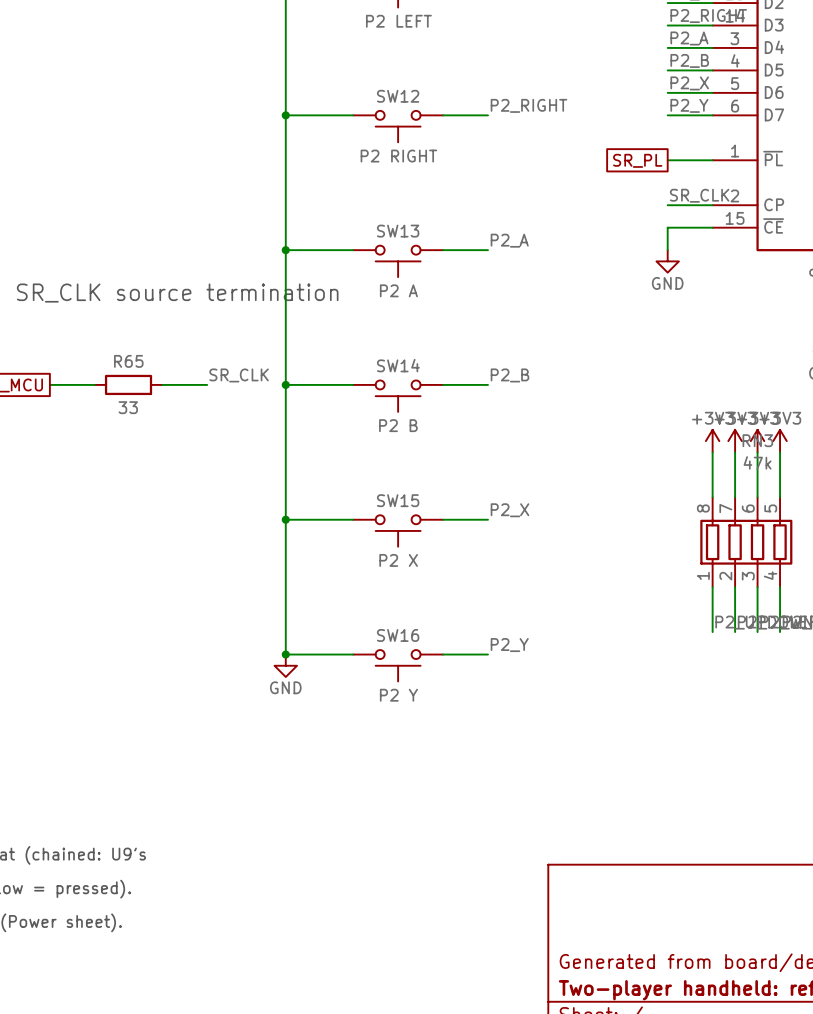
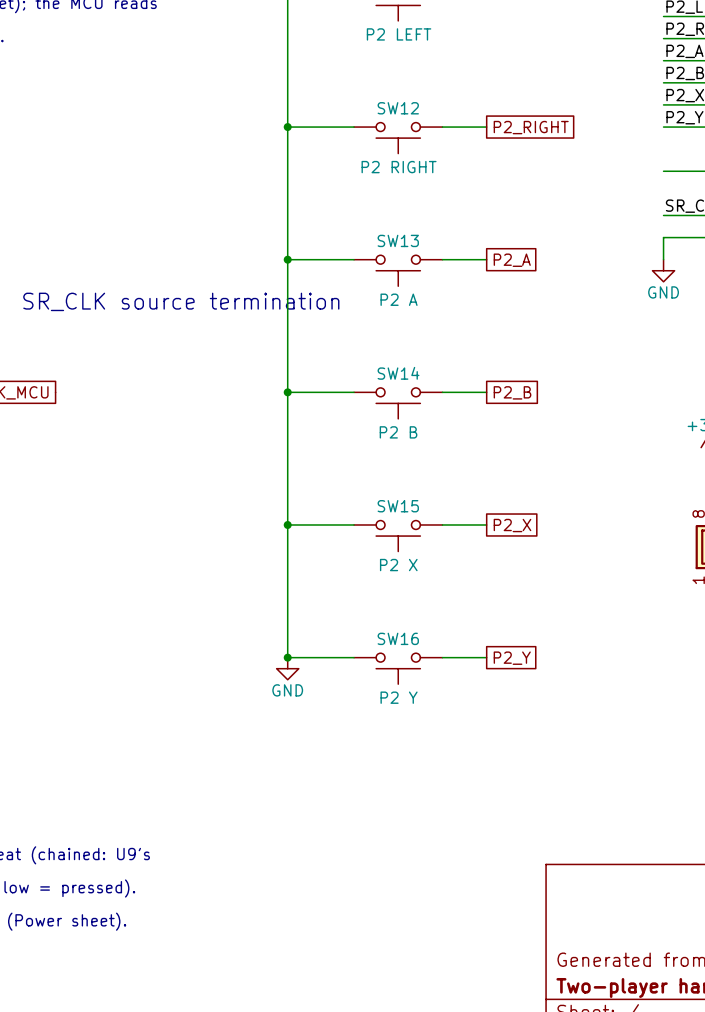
label: P2_RIGHT (528, 105) -> none
global label: none -> P2_RIGHT (531, 127)
global label: SR_PL (637, 160) -> none
label: P2_A (509, 240) -> none
global label: none -> P2_A (512, 260)
label: SR_CLK (239, 375) -> none
label: P2_B (509, 375) -> none
wire: (49, 384) (94, 384) -> none
R65: 33 (128, 384) -> none
wire: (162, 384) (207, 384) -> none
global label: none -> P2_B (512, 392)
label: P2_X (509, 510) -> none
global label: none -> P2_X (512, 525)
label: P2_Y (509, 645) -> none
global label: none -> P2_Y (512, 658)

